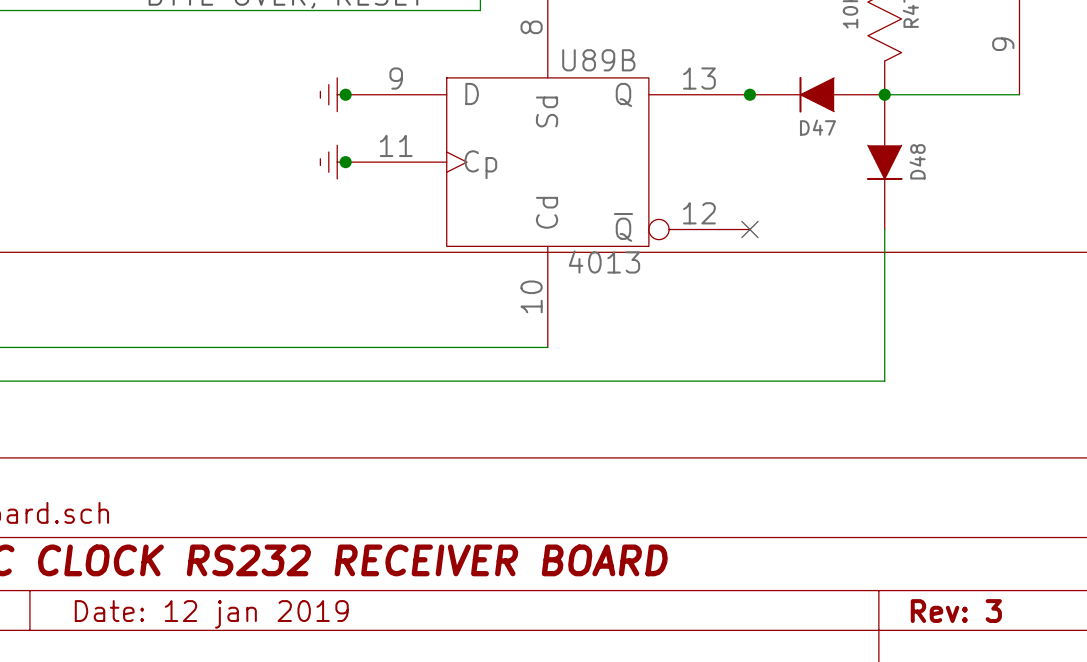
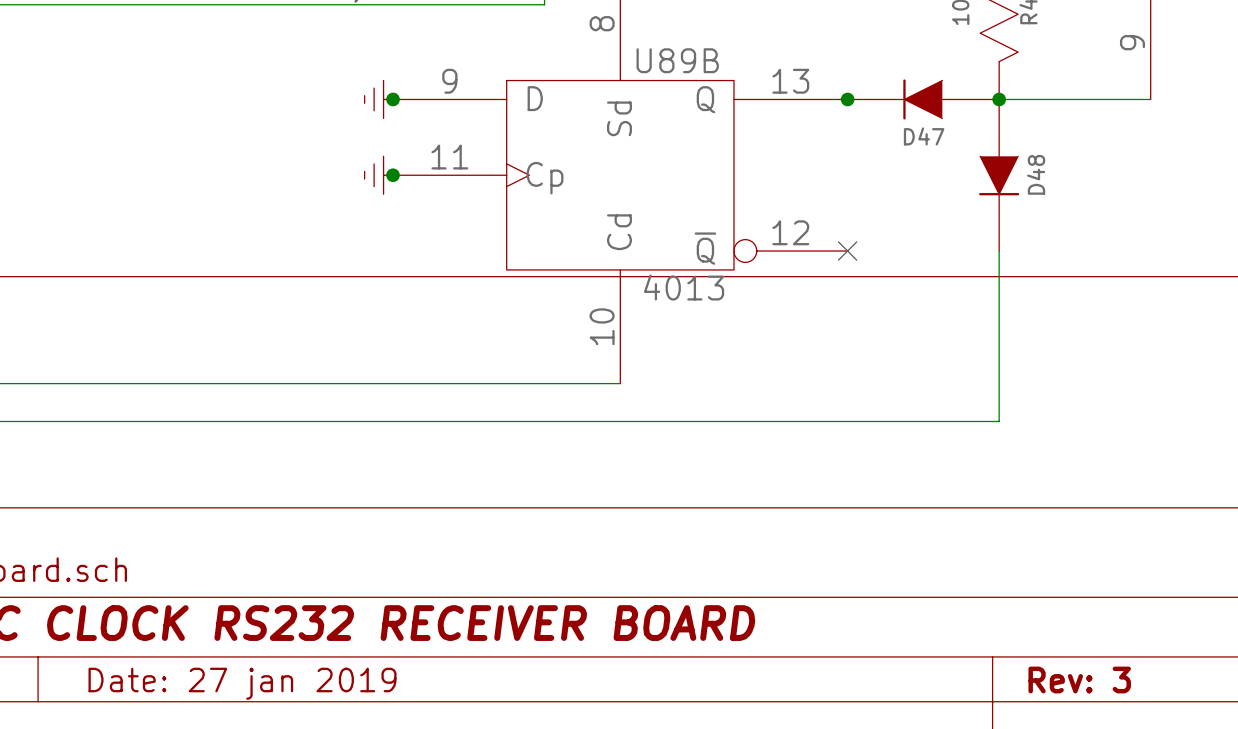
title block: Date: 12 jan 2019 (211, 614) -> Date: 27 jan 2019 (242, 683)

